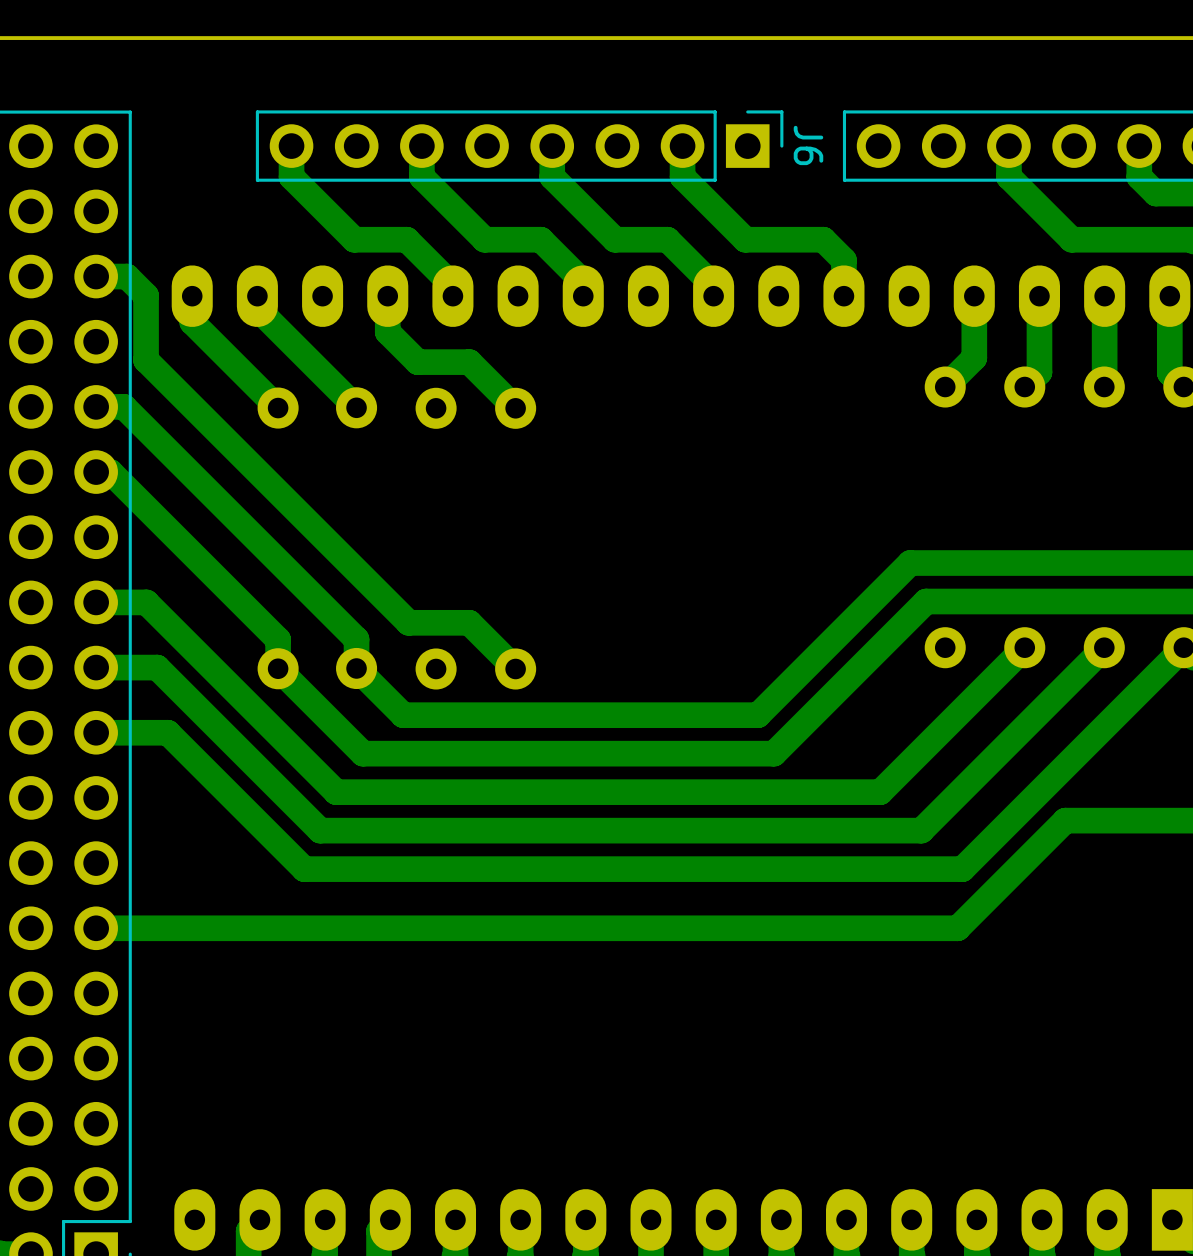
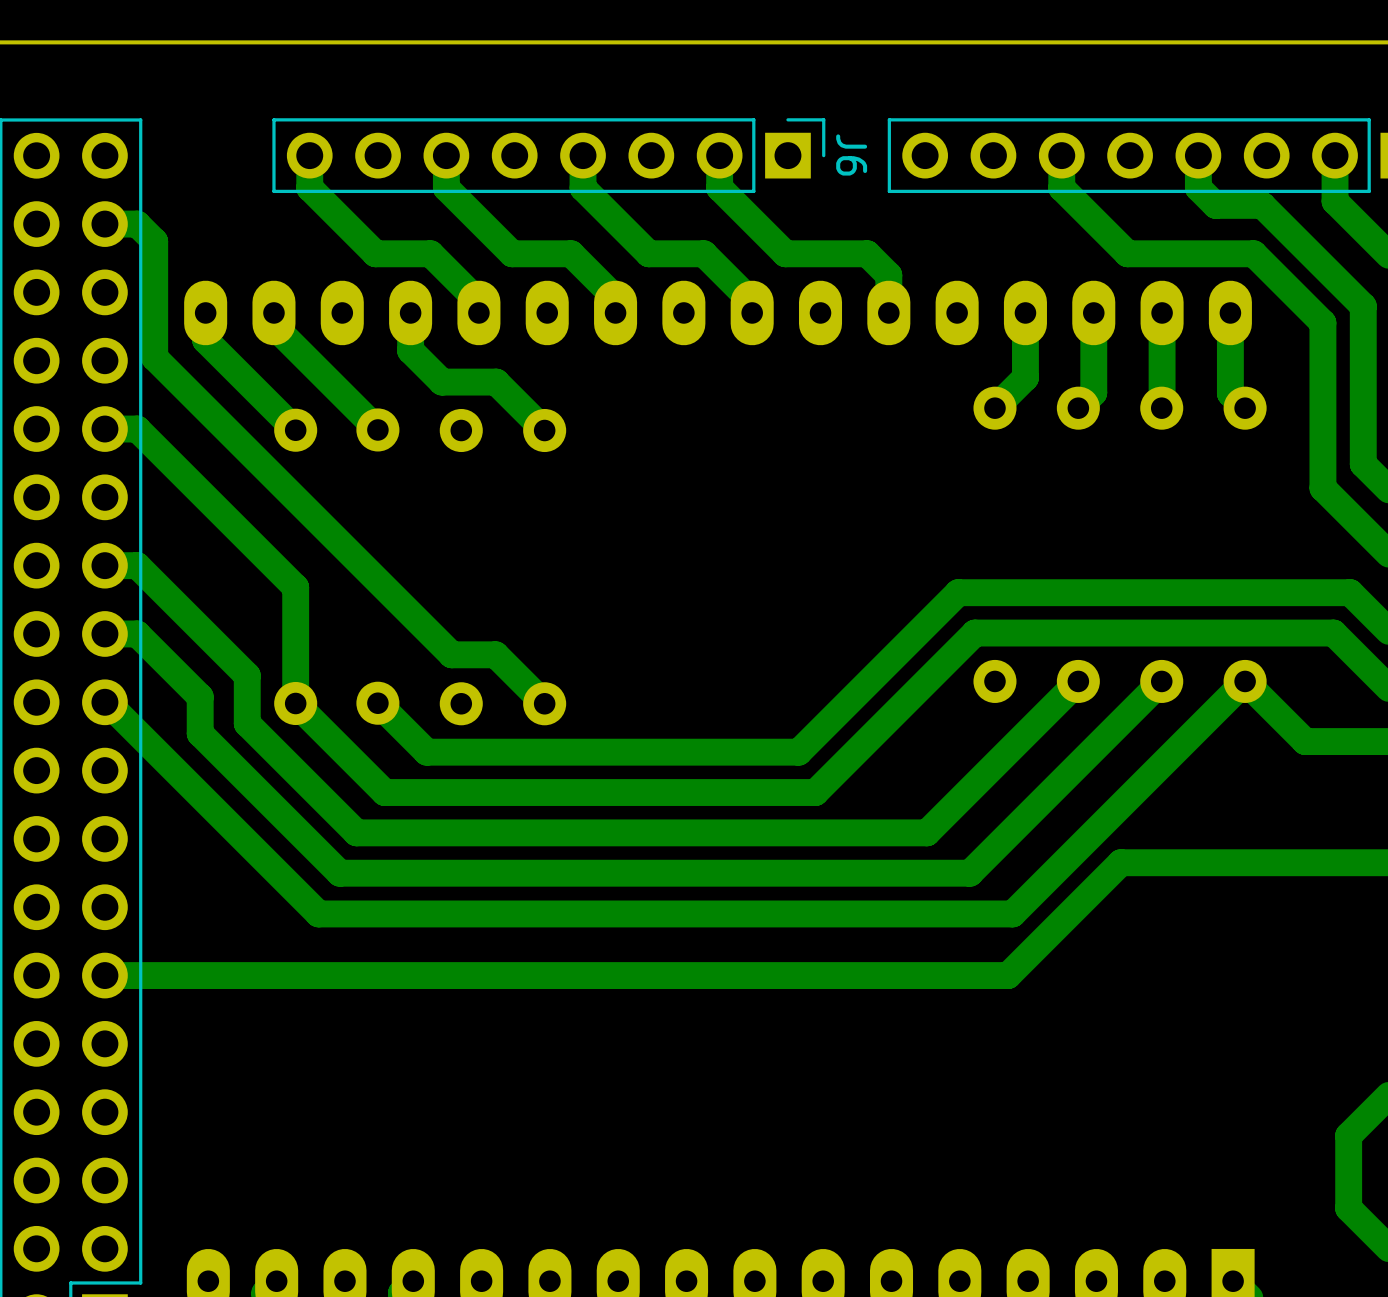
track: (96, 276) (126, 276) (146, 295) (146, 360) (408, 622) (469, 622) -> (104, 224) (137, 224) (154, 241) (154, 357) (451, 654) (496, 655)
track: (123, 406) (356, 639) (356, 668) -> none
track: (96, 472) (110, 472) (278, 639) -> (134, 429) (137, 429) (295, 587) (295, 673)
track: none -> (104, 565) (137, 565) (247, 675) (247, 723)
track: (126, 602) (146, 602) (231, 687) -> (137, 633) (200, 696) (200, 733)
track: (98, 667) (157, 667) (187, 697) -> none
track: (96, 732) (167, 732) (304, 869) (962, 869) -> (106, 702) (318, 913) (1013, 913)

